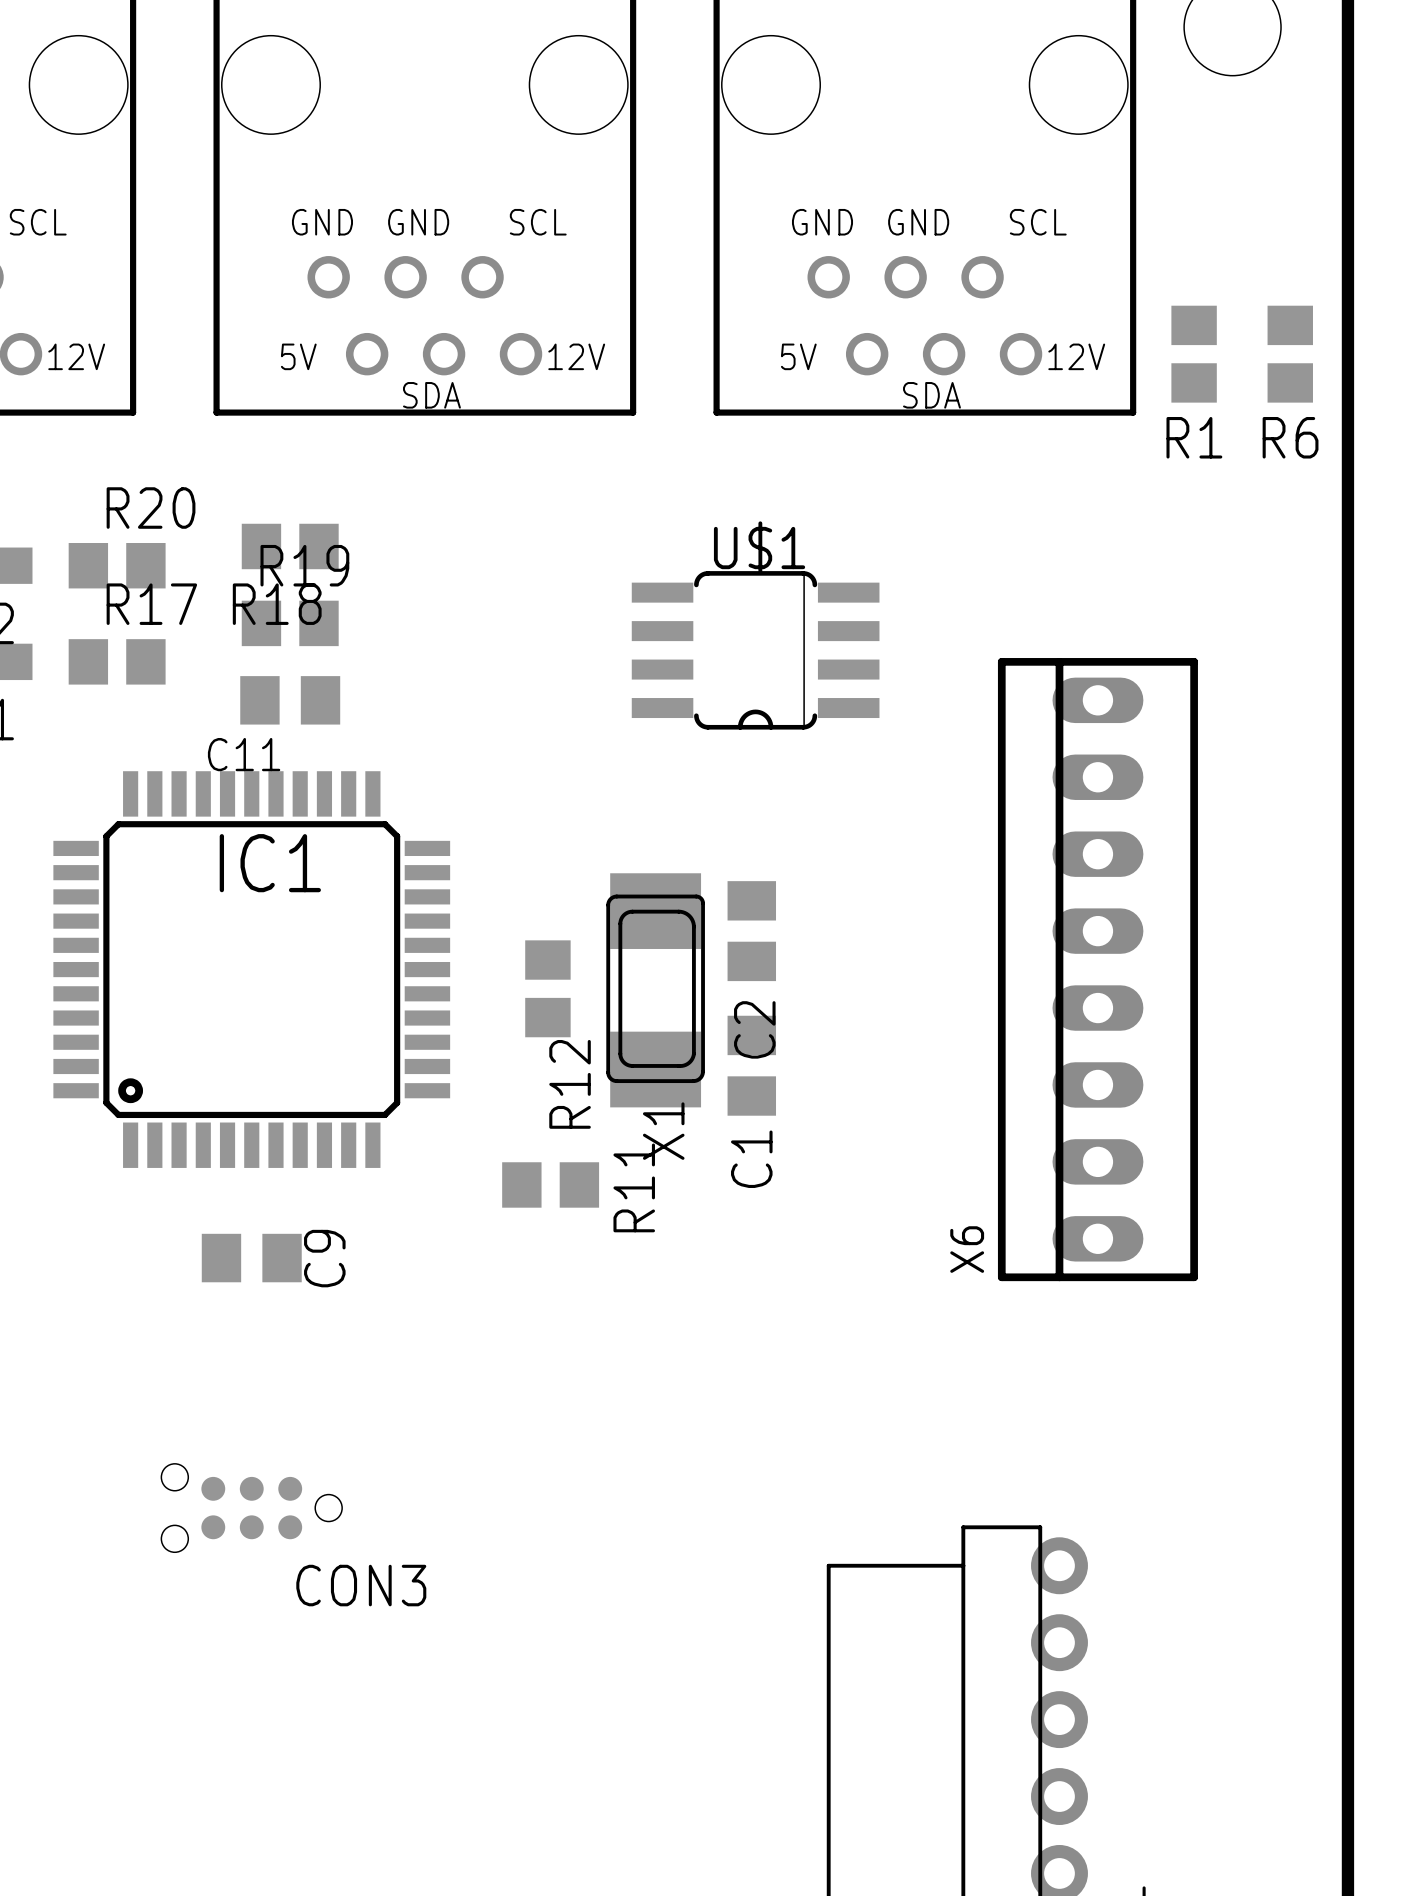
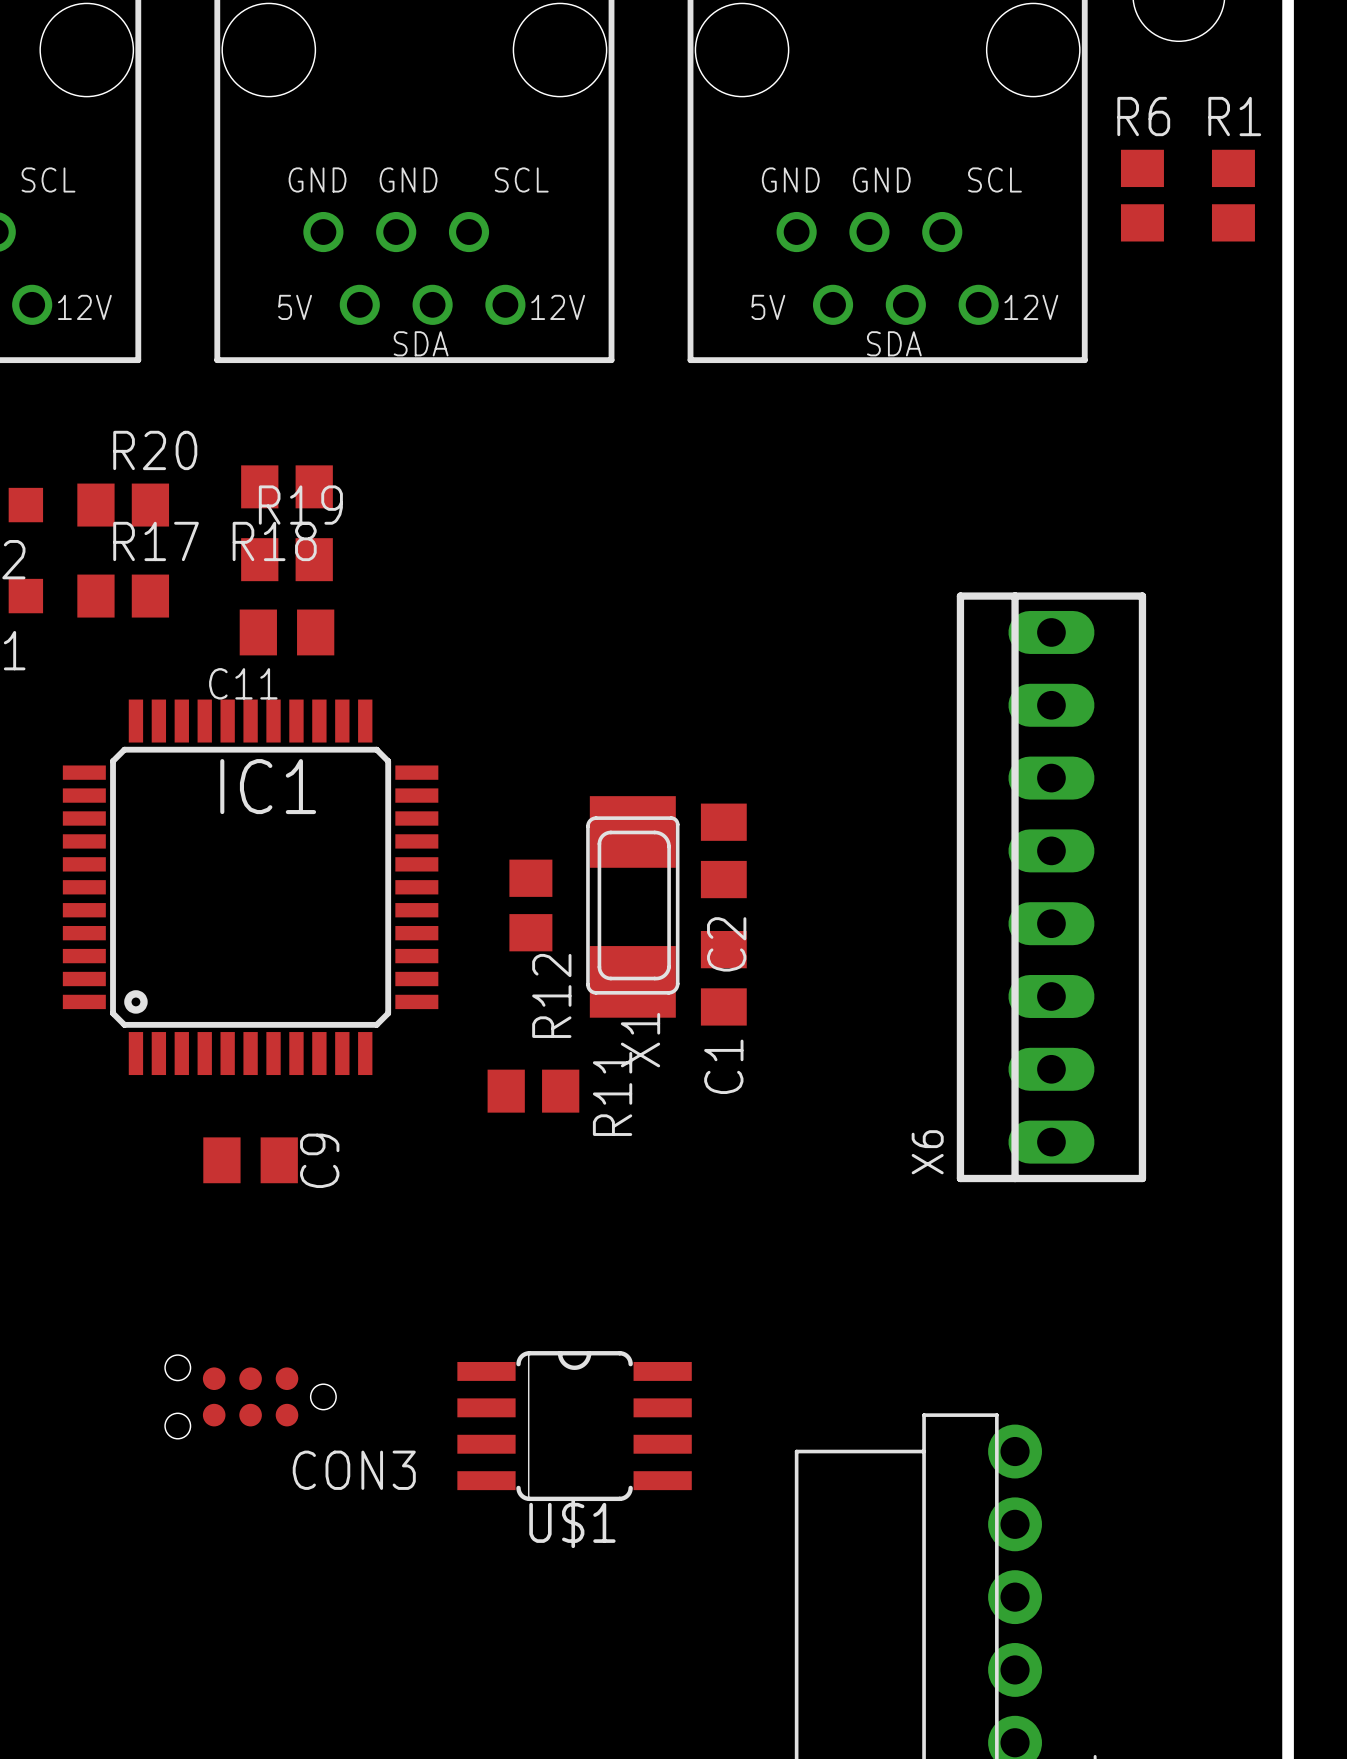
R1 position: (1194, 354) -> (1233, 195)
R6 position: (1290, 354) -> (1142, 195)
R1 name position: R1 (1194, 437) -> R1 (1234, 116)
R6 name position: R6 (1290, 437) -> R6 (1143, 116)
U$1 rotation: 0° (755, 650) -> 180° (574, 1426)
U$1 position: (755, 650) -> (574, 1426)

